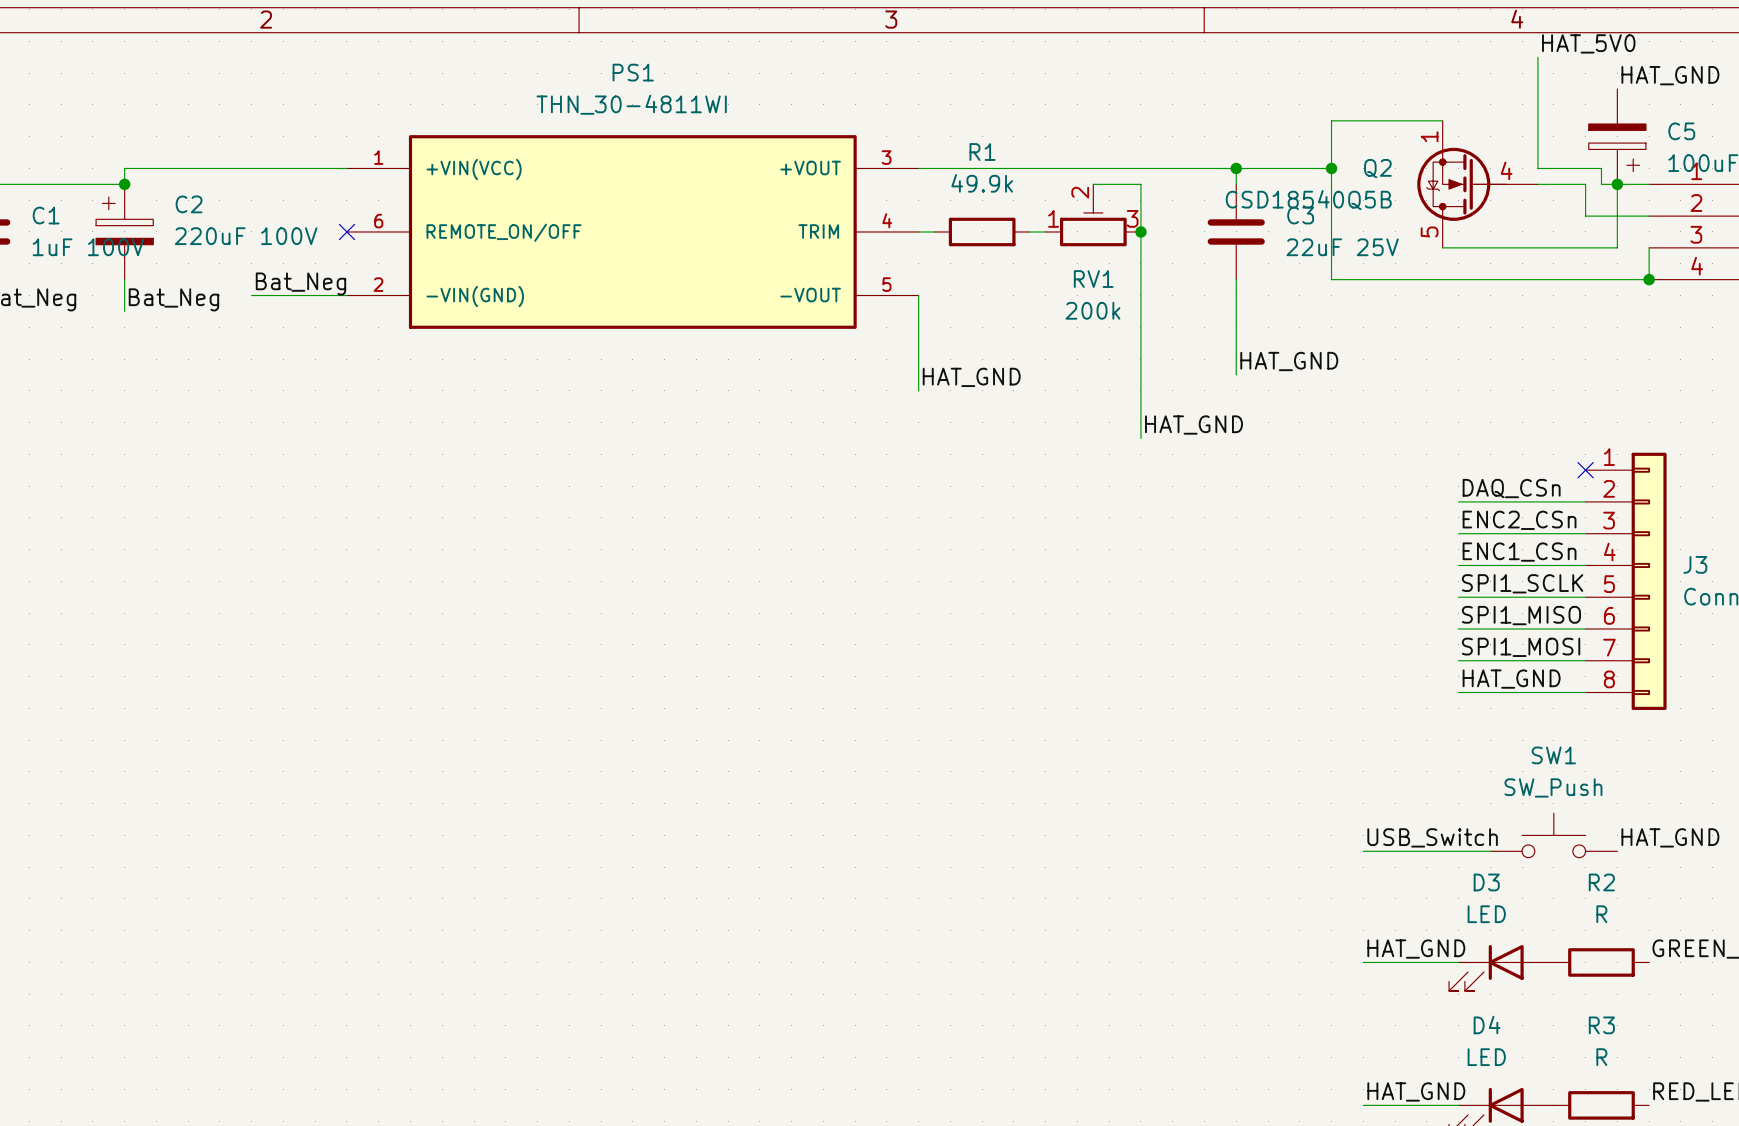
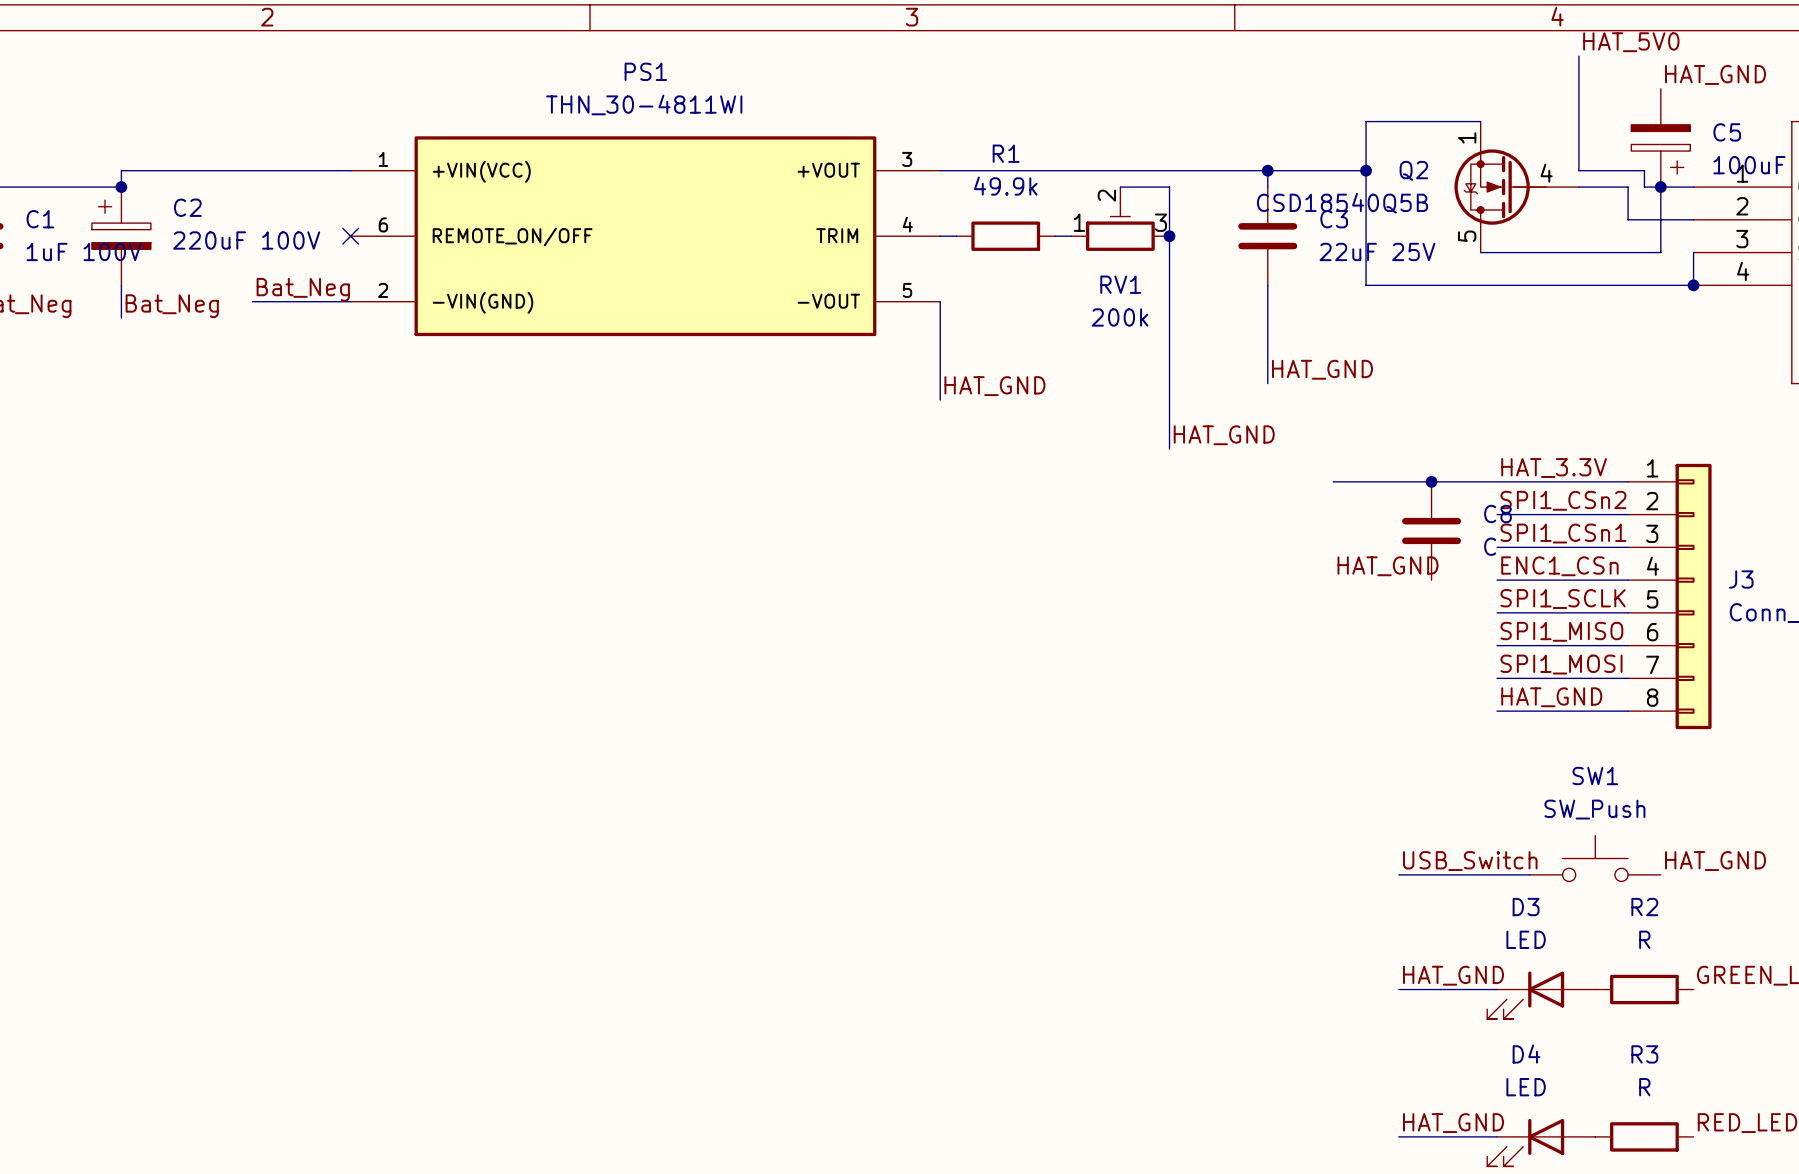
label: none -> HAT_3.3V (1554, 468)
wire: none -> (1333, 481) (1628, 481)
junction: none -> (1431, 481)
no-connect mark: (1585, 470) -> none
label: DAQ_CSn (1511, 488) -> SPI1_CSn2 (1563, 500)
C8: none -> C (1431, 530)
label: ENC2_CSn (1519, 520) -> SPI1_CSn1 (1563, 533)
label: none -> HAT_GND (1387, 566)

